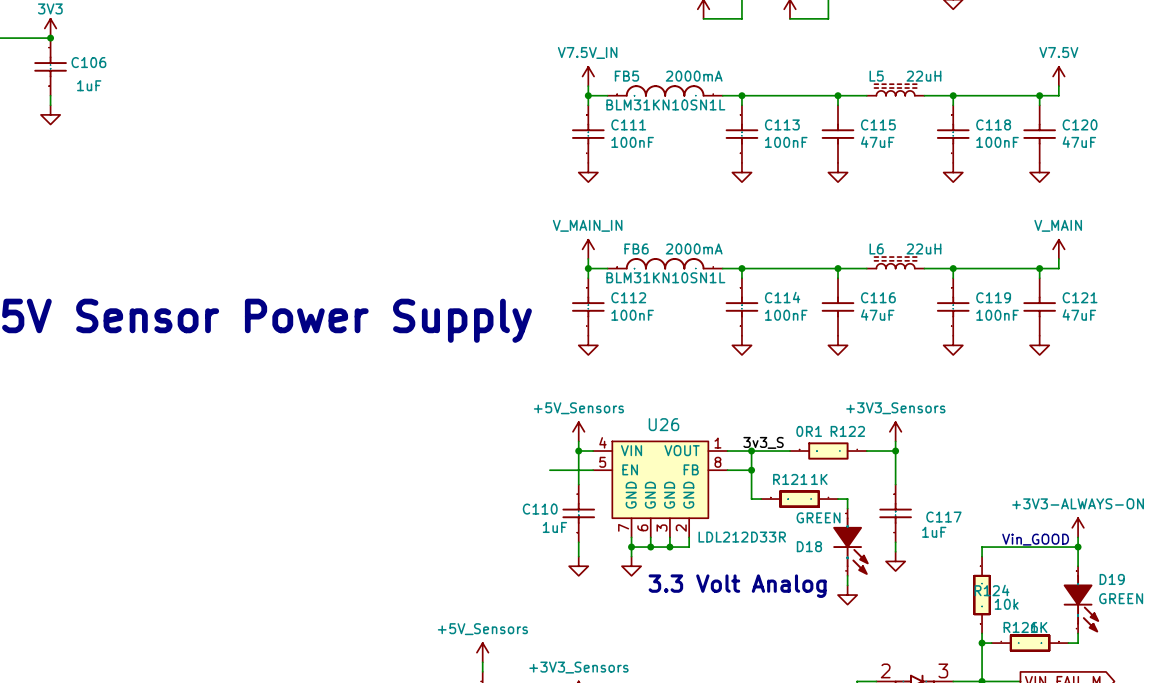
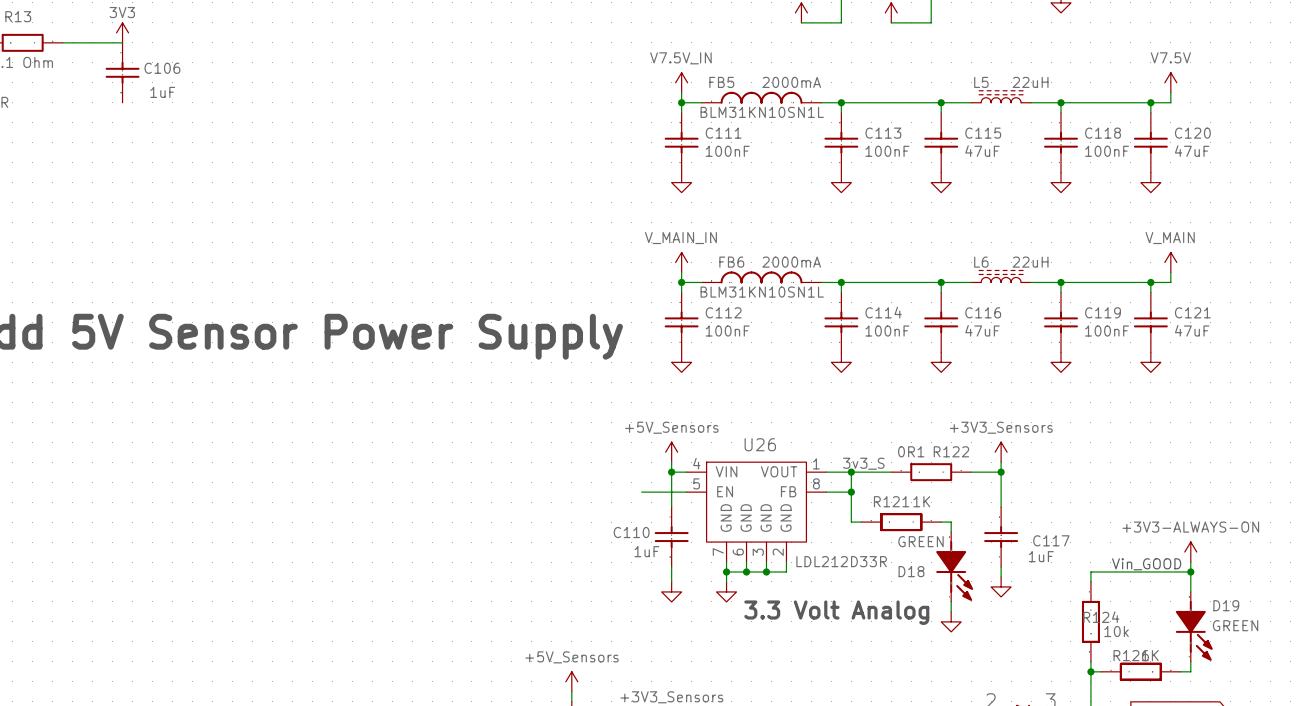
junction: (50, 38) -> none
wire: (50, 95) (50, 105) -> none
power symbol: (50, 114) -> none

